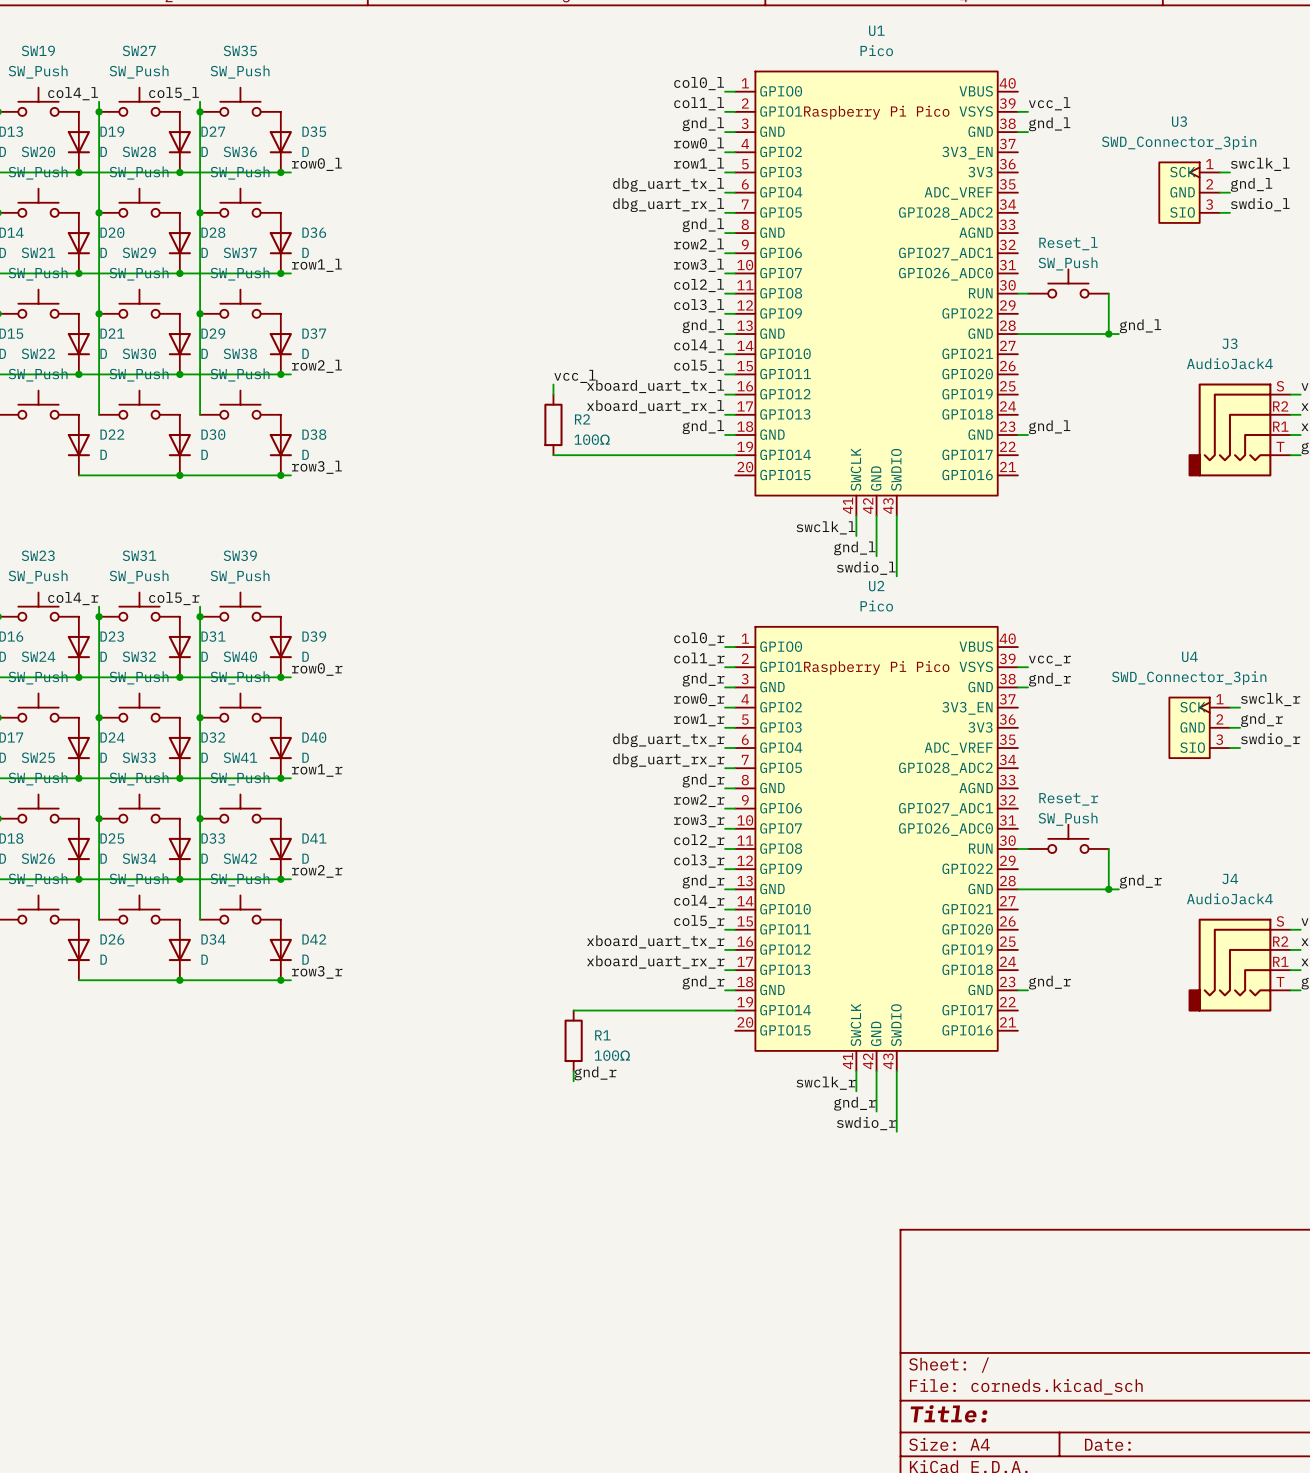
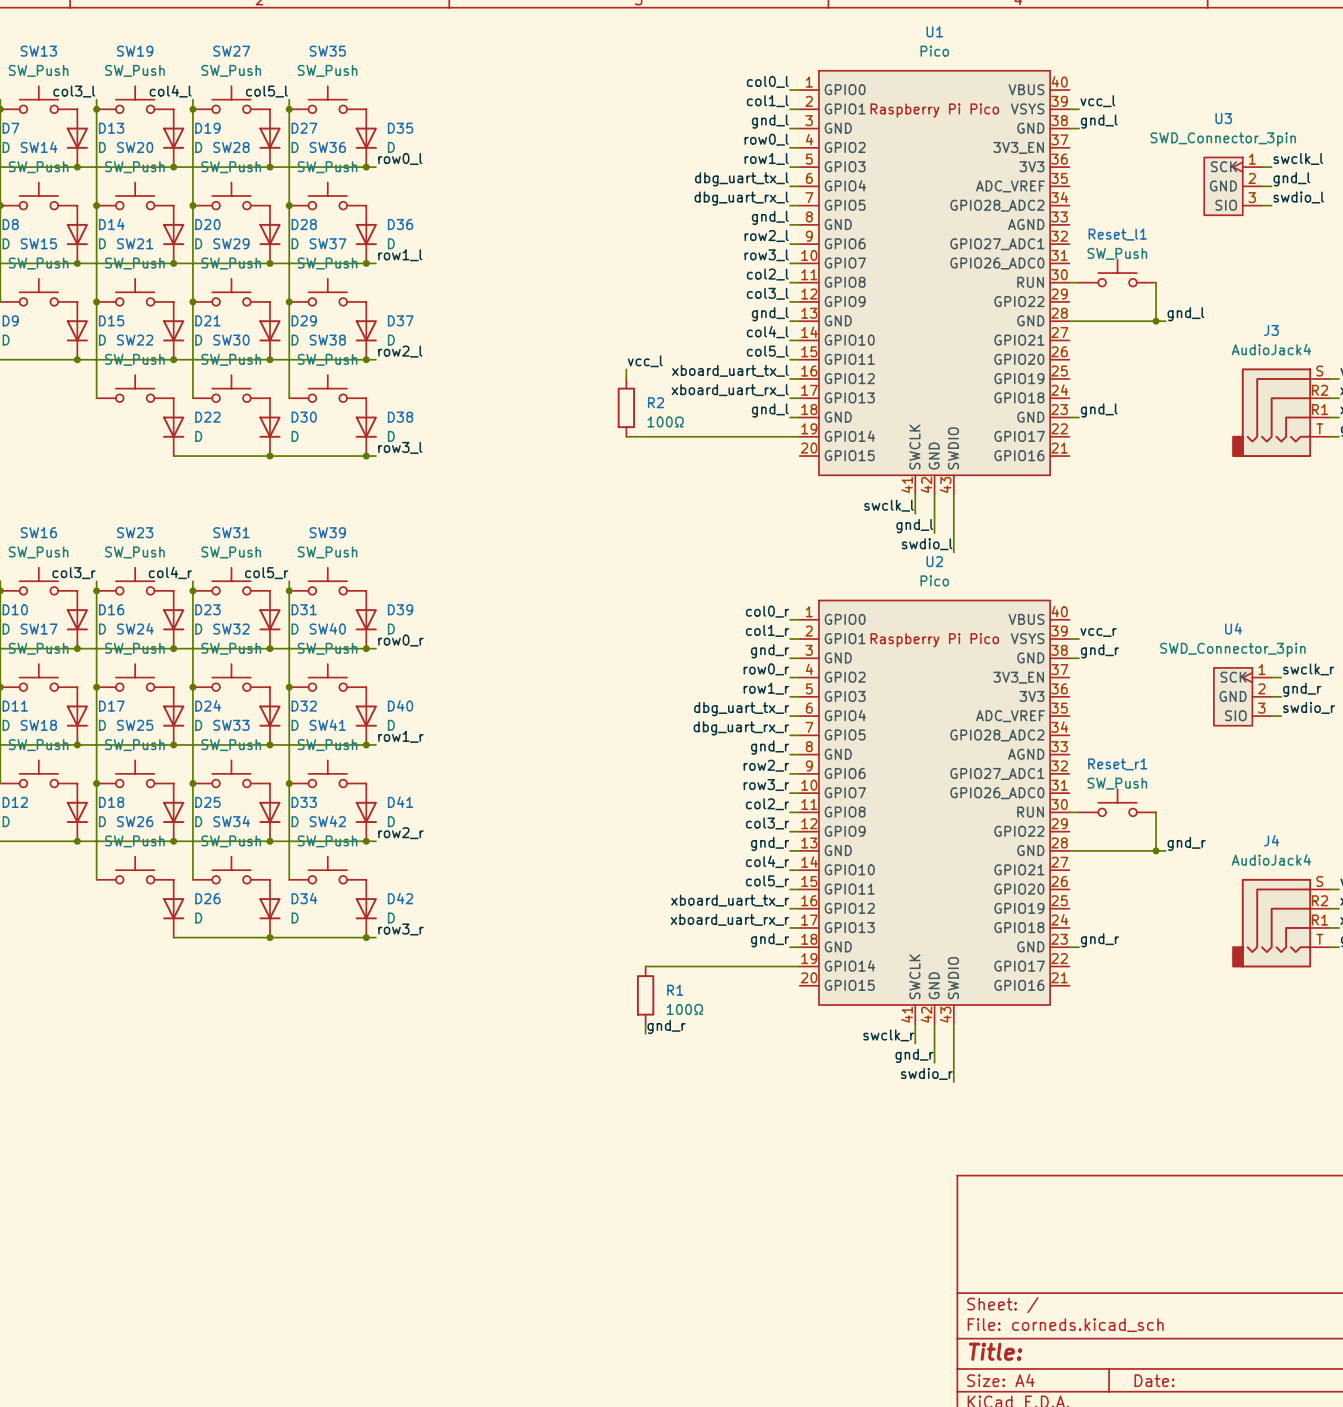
Reset_l name: Reset_l (1068, 243) -> Reset_l1 (1117, 234)
Reset_r name: Reset_r (1068, 799) -> Reset_r1 (1117, 764)

